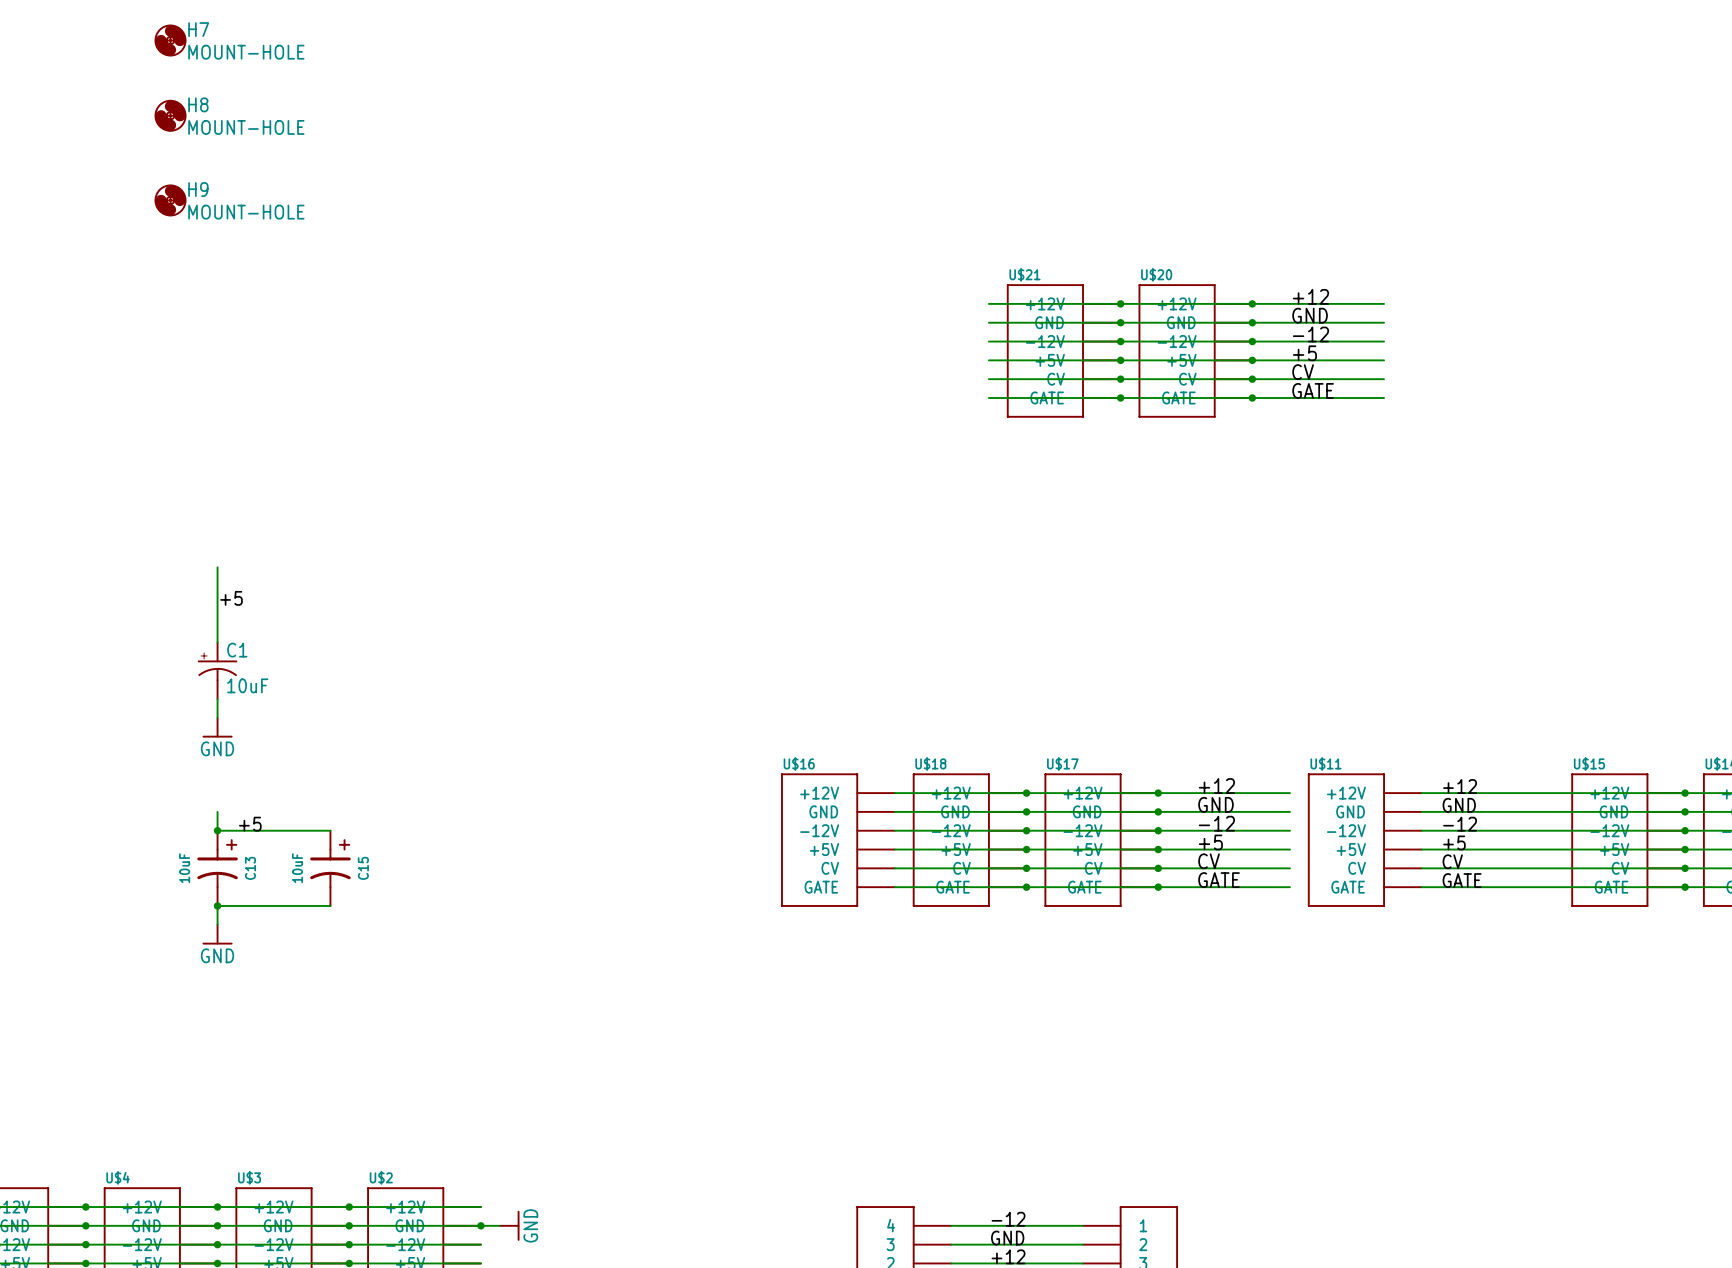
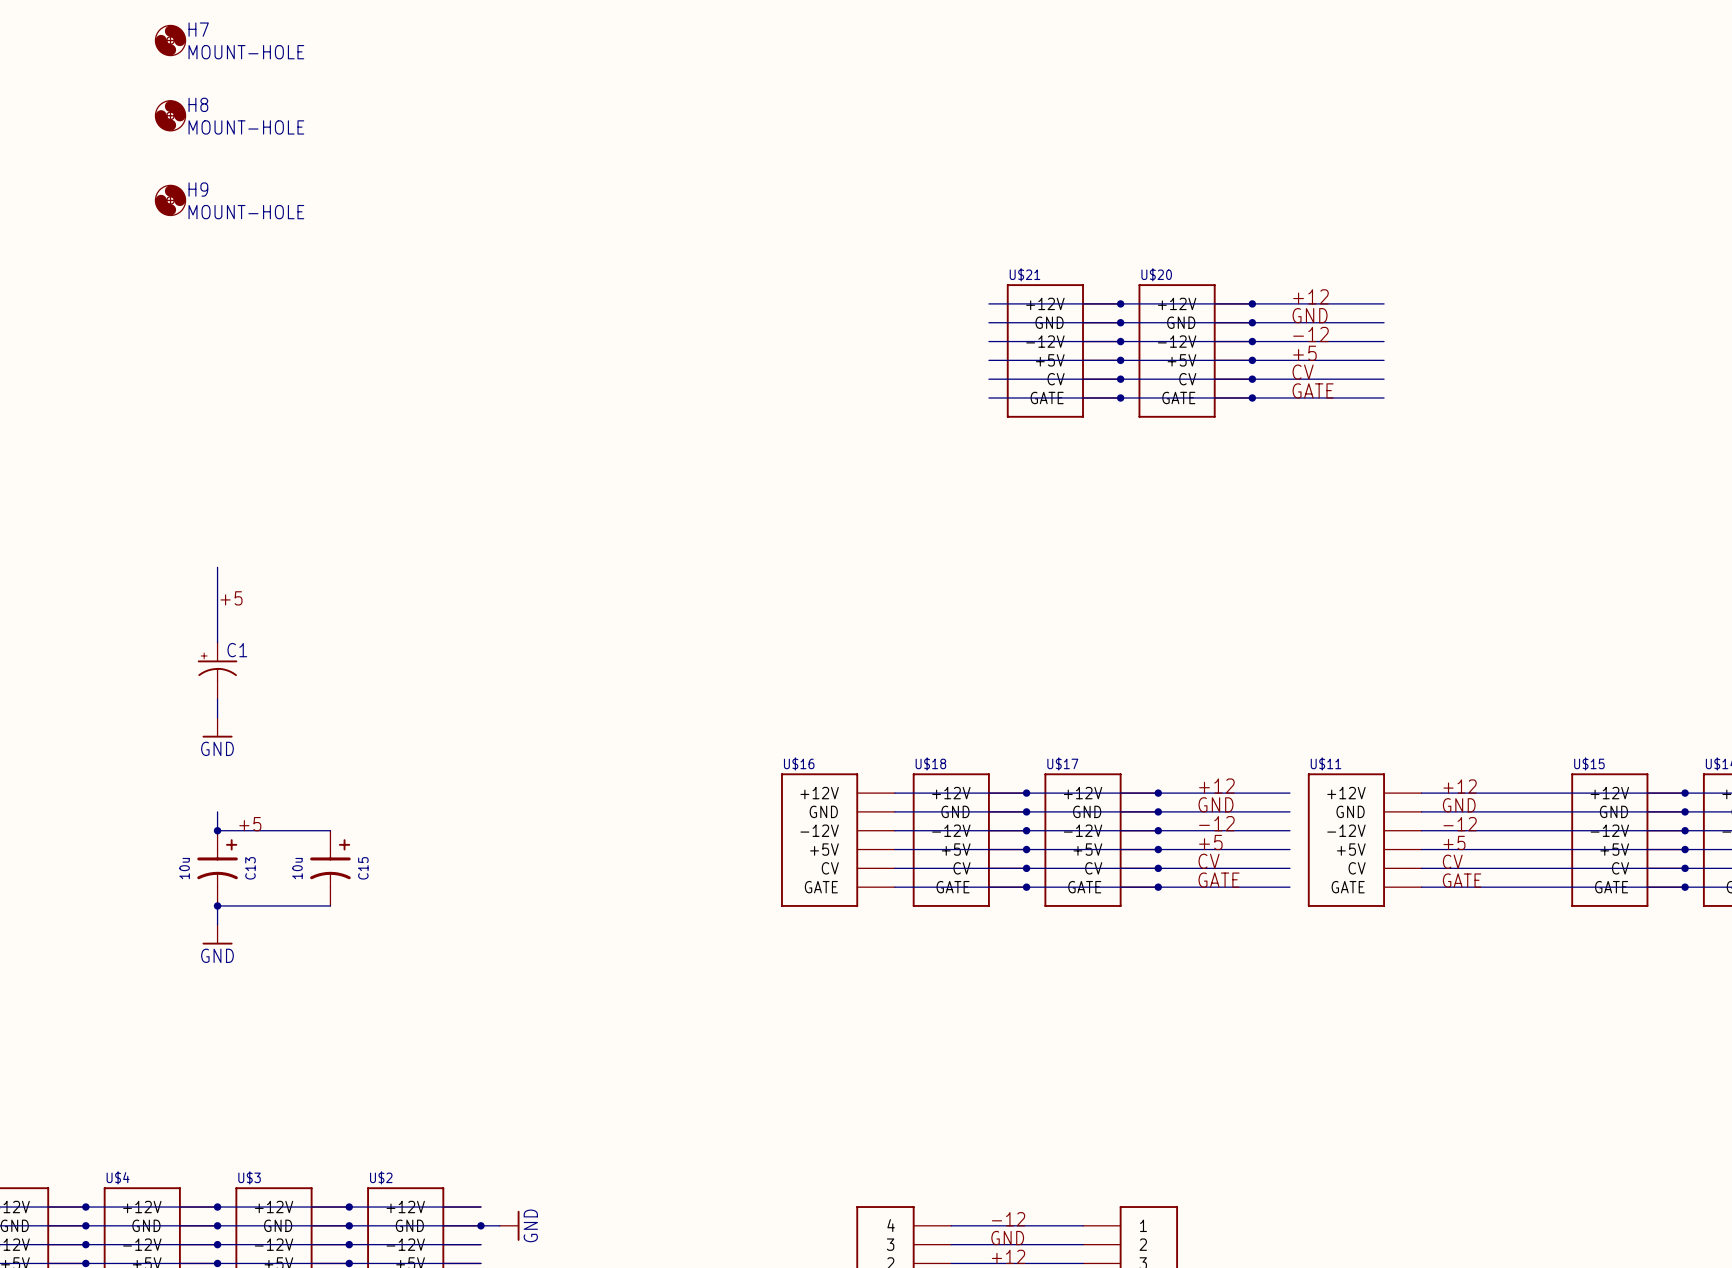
C1 value: 10uF (247, 685) -> none
C13 value: 10uF (184, 868) -> 10u (184, 868)
C15 value: 10uF (297, 868) -> 10u (297, 868)

